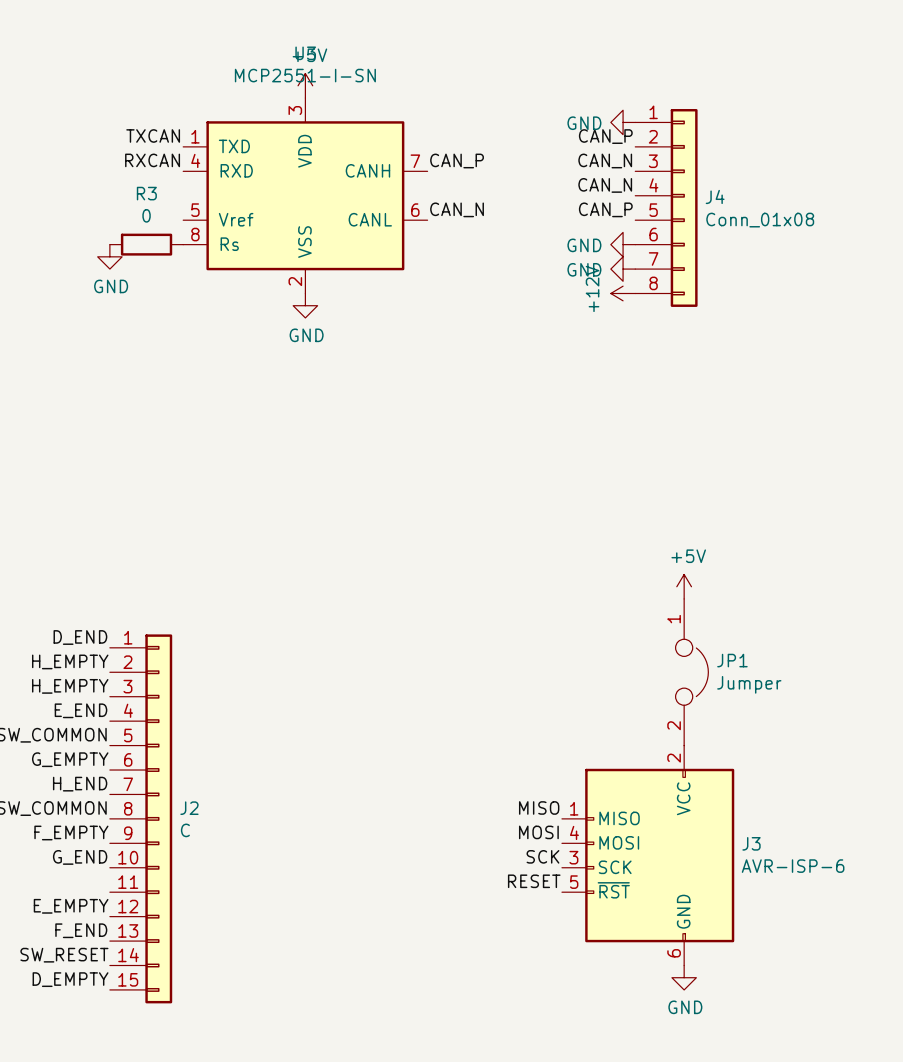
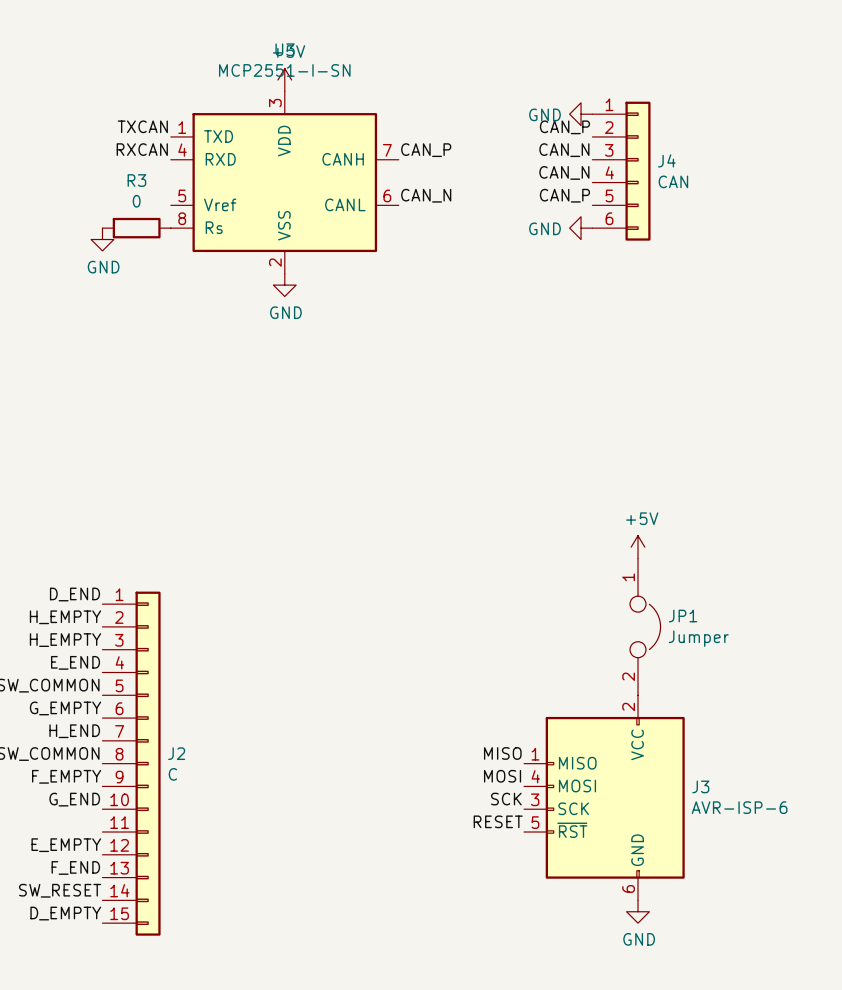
J4 symbol: [635, 109, 698, 307] -> [592, 101, 651, 241]
J4 value: Conn_01x08 (760, 220) -> CAN (673, 181)
power symbol: GND (623, 269) -> none
power symbol: +12V (623, 293) -> none

